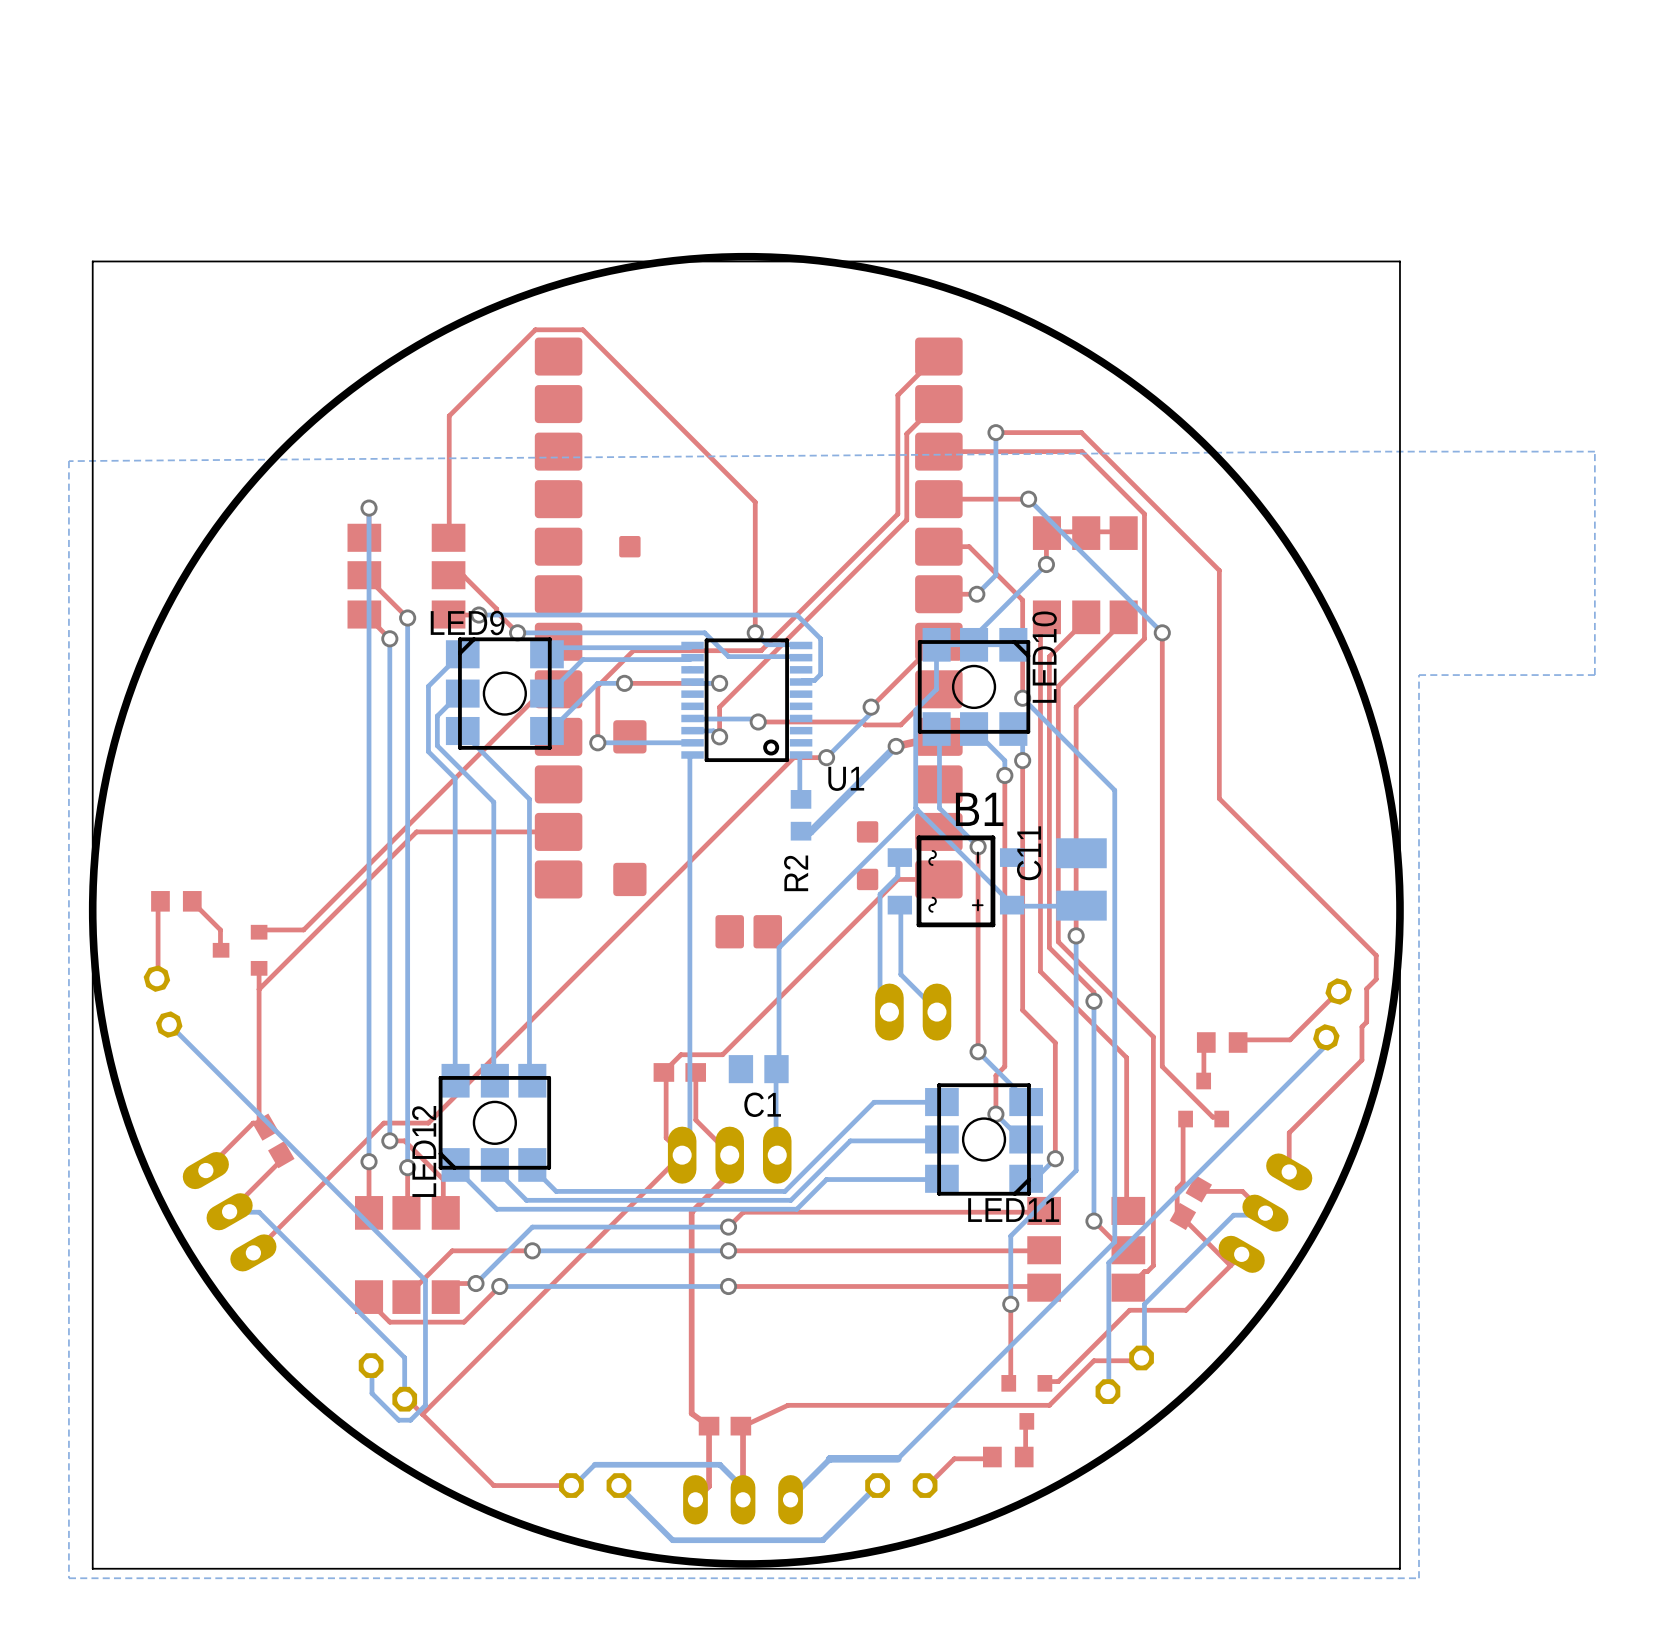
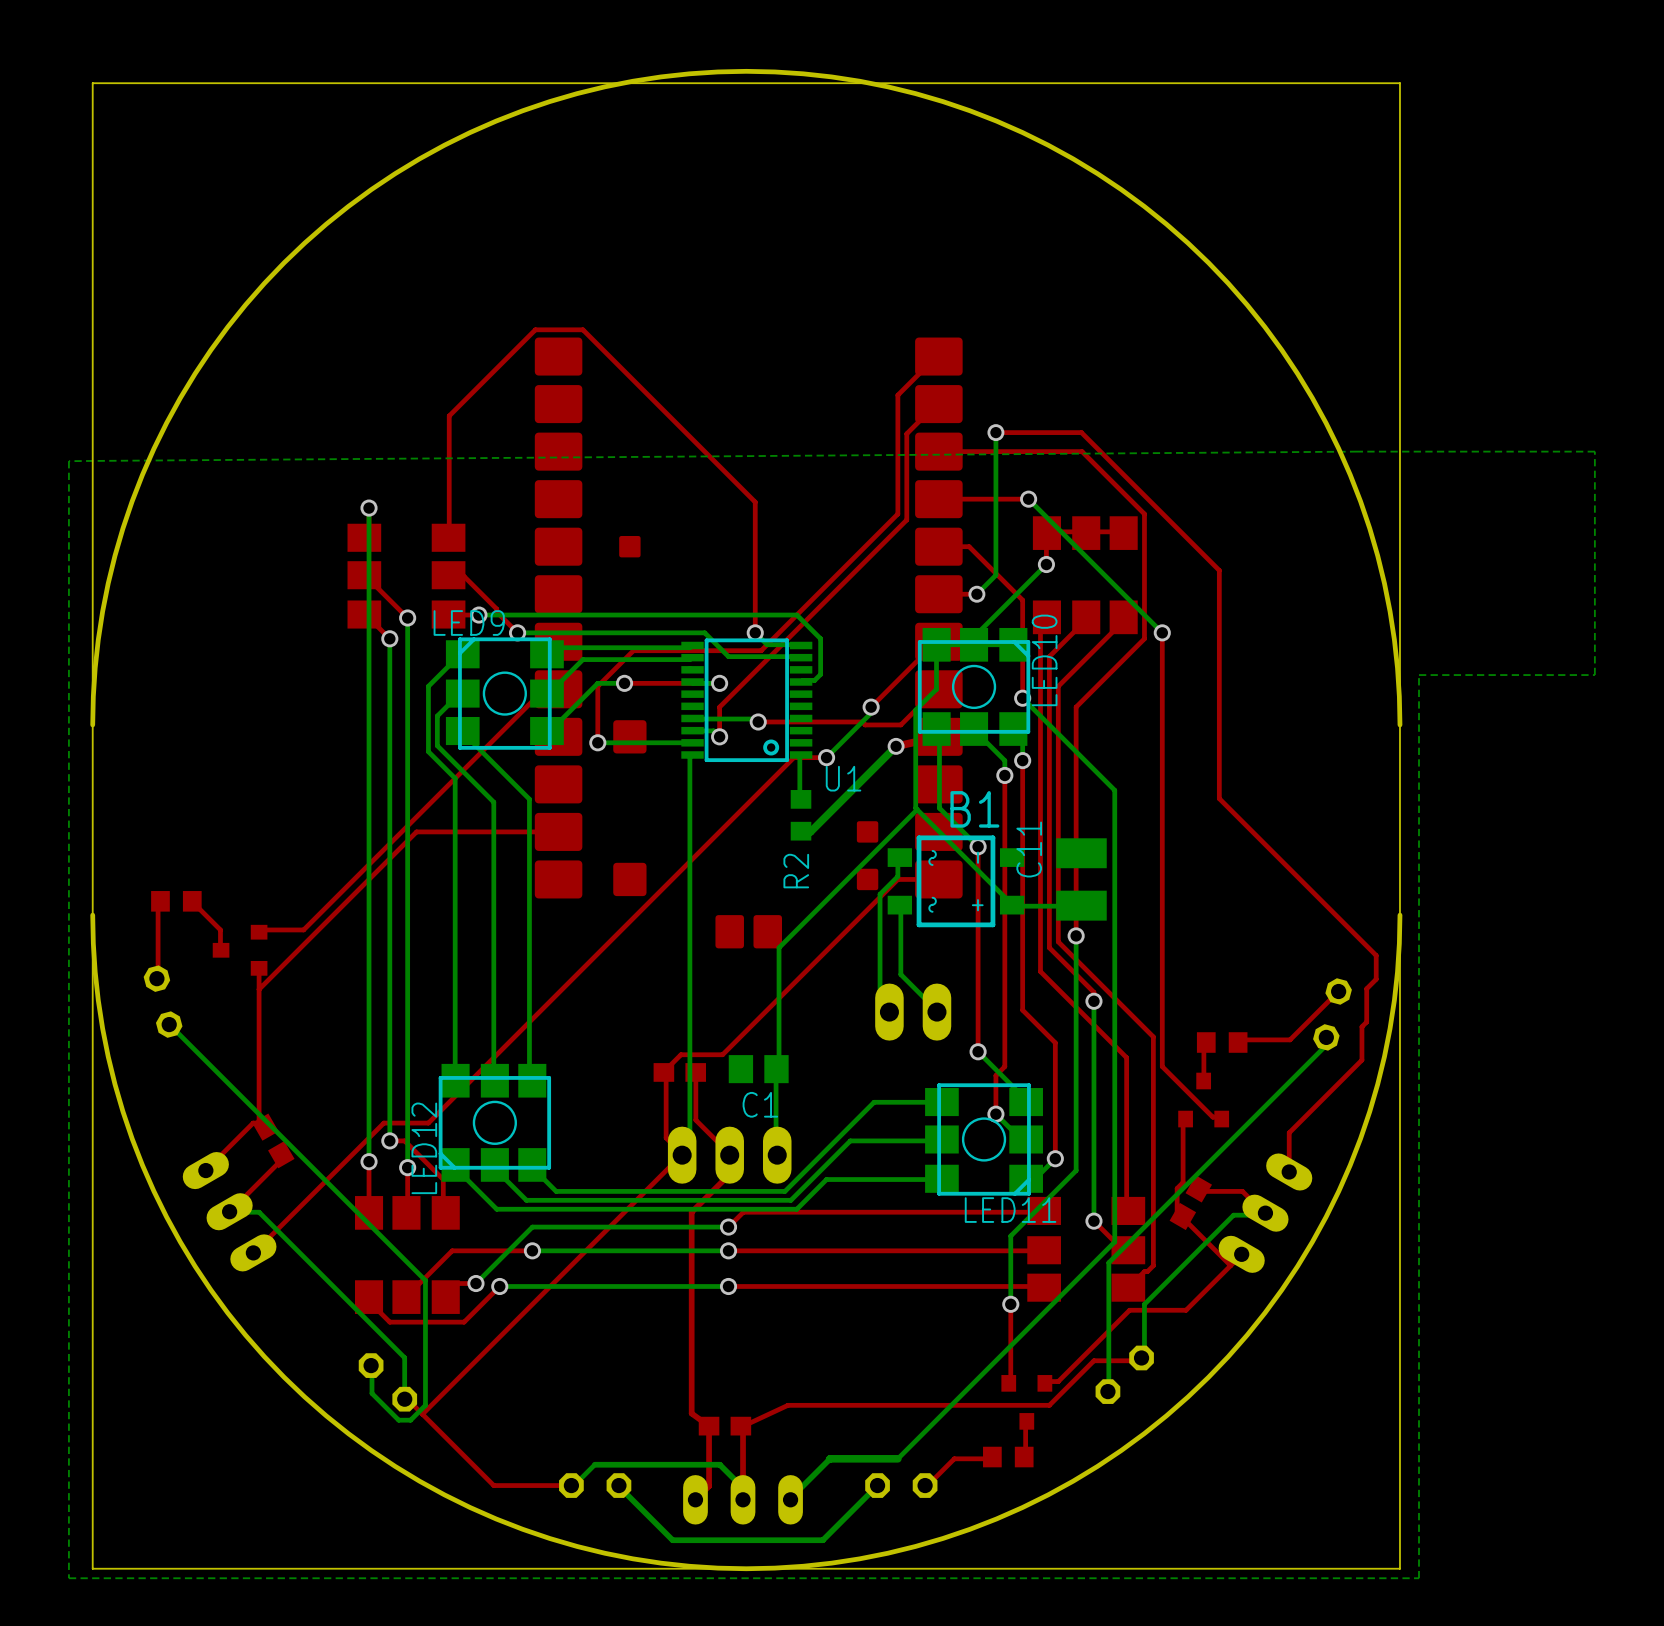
round board edge: [88, 252, 1404, 1568] -> none
board edge: (1399, 261) (92, 261) -> (1399, 261) (1399, 83) (92, 83) (92, 261)
board edge: none -> (1399, 724) (1397, 667) (1390, 611) (1377, 555) (1350, 474) (1326, 423) (1281, 350) (1247, 304) (1208, 262) (1166, 224) (1121, 189) (1048, 145) (996, 121) (915, 93) (859, 81) (803, 73) (746, 71) (689, 73) (632, 81) (577, 93) (496, 121) (444, 145) (371, 189) (326, 224) (284, 262) (245, 304) (210, 350) (166, 423) (142, 474) (114, 555) (102, 611) (95, 667) (92, 724)
board edge: none -> (1399, 915) (1397, 972) (1390, 1028) (1377, 1084) (1350, 1165) (1326, 1216) (1281, 1290) (1247, 1335) (1208, 1377) (1166, 1415) (1121, 1450) (1048, 1494) (996, 1518) (915, 1546) (859, 1558) (803, 1566) (746, 1568) (689, 1566) (632, 1558) (577, 1546) (496, 1518) (444, 1494) (371, 1450) (326, 1415) (284, 1377) (245, 1335) (210, 1290) (166, 1216) (142, 1165) (114, 1084) (102, 1028) (95, 972) (92, 915)

